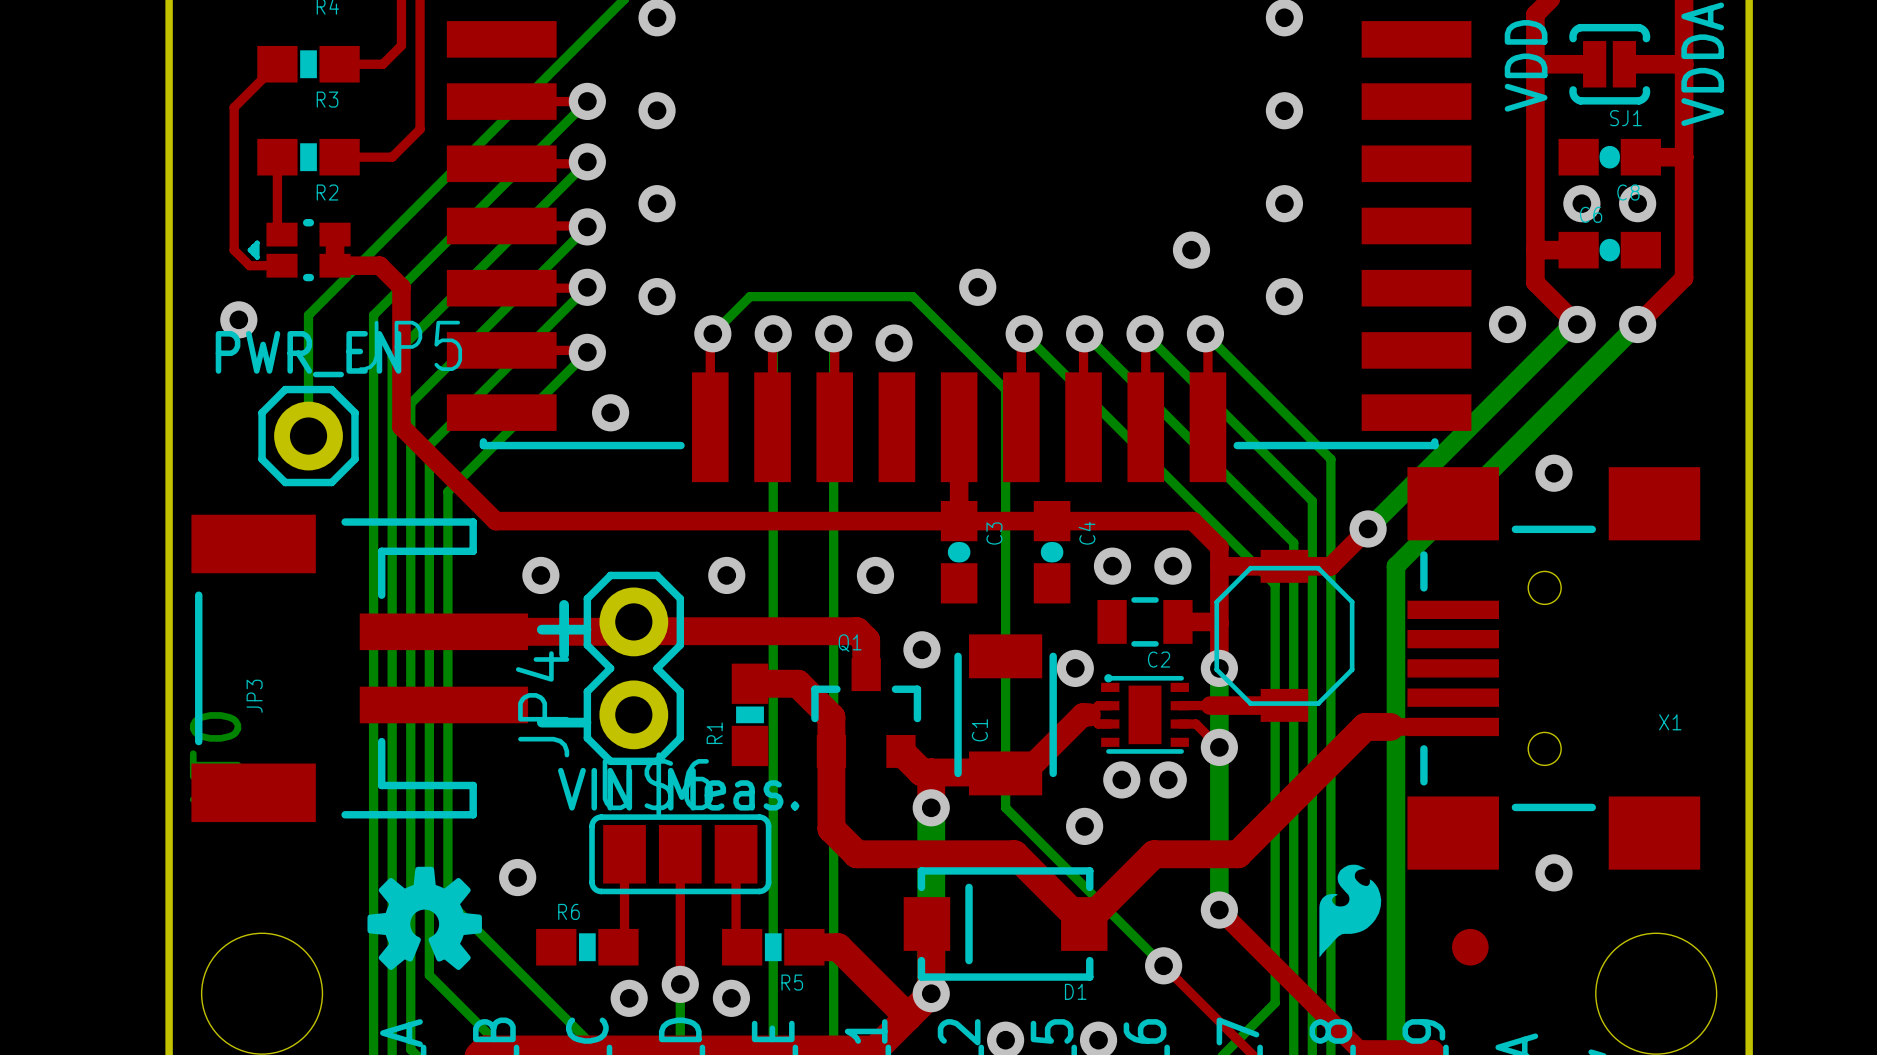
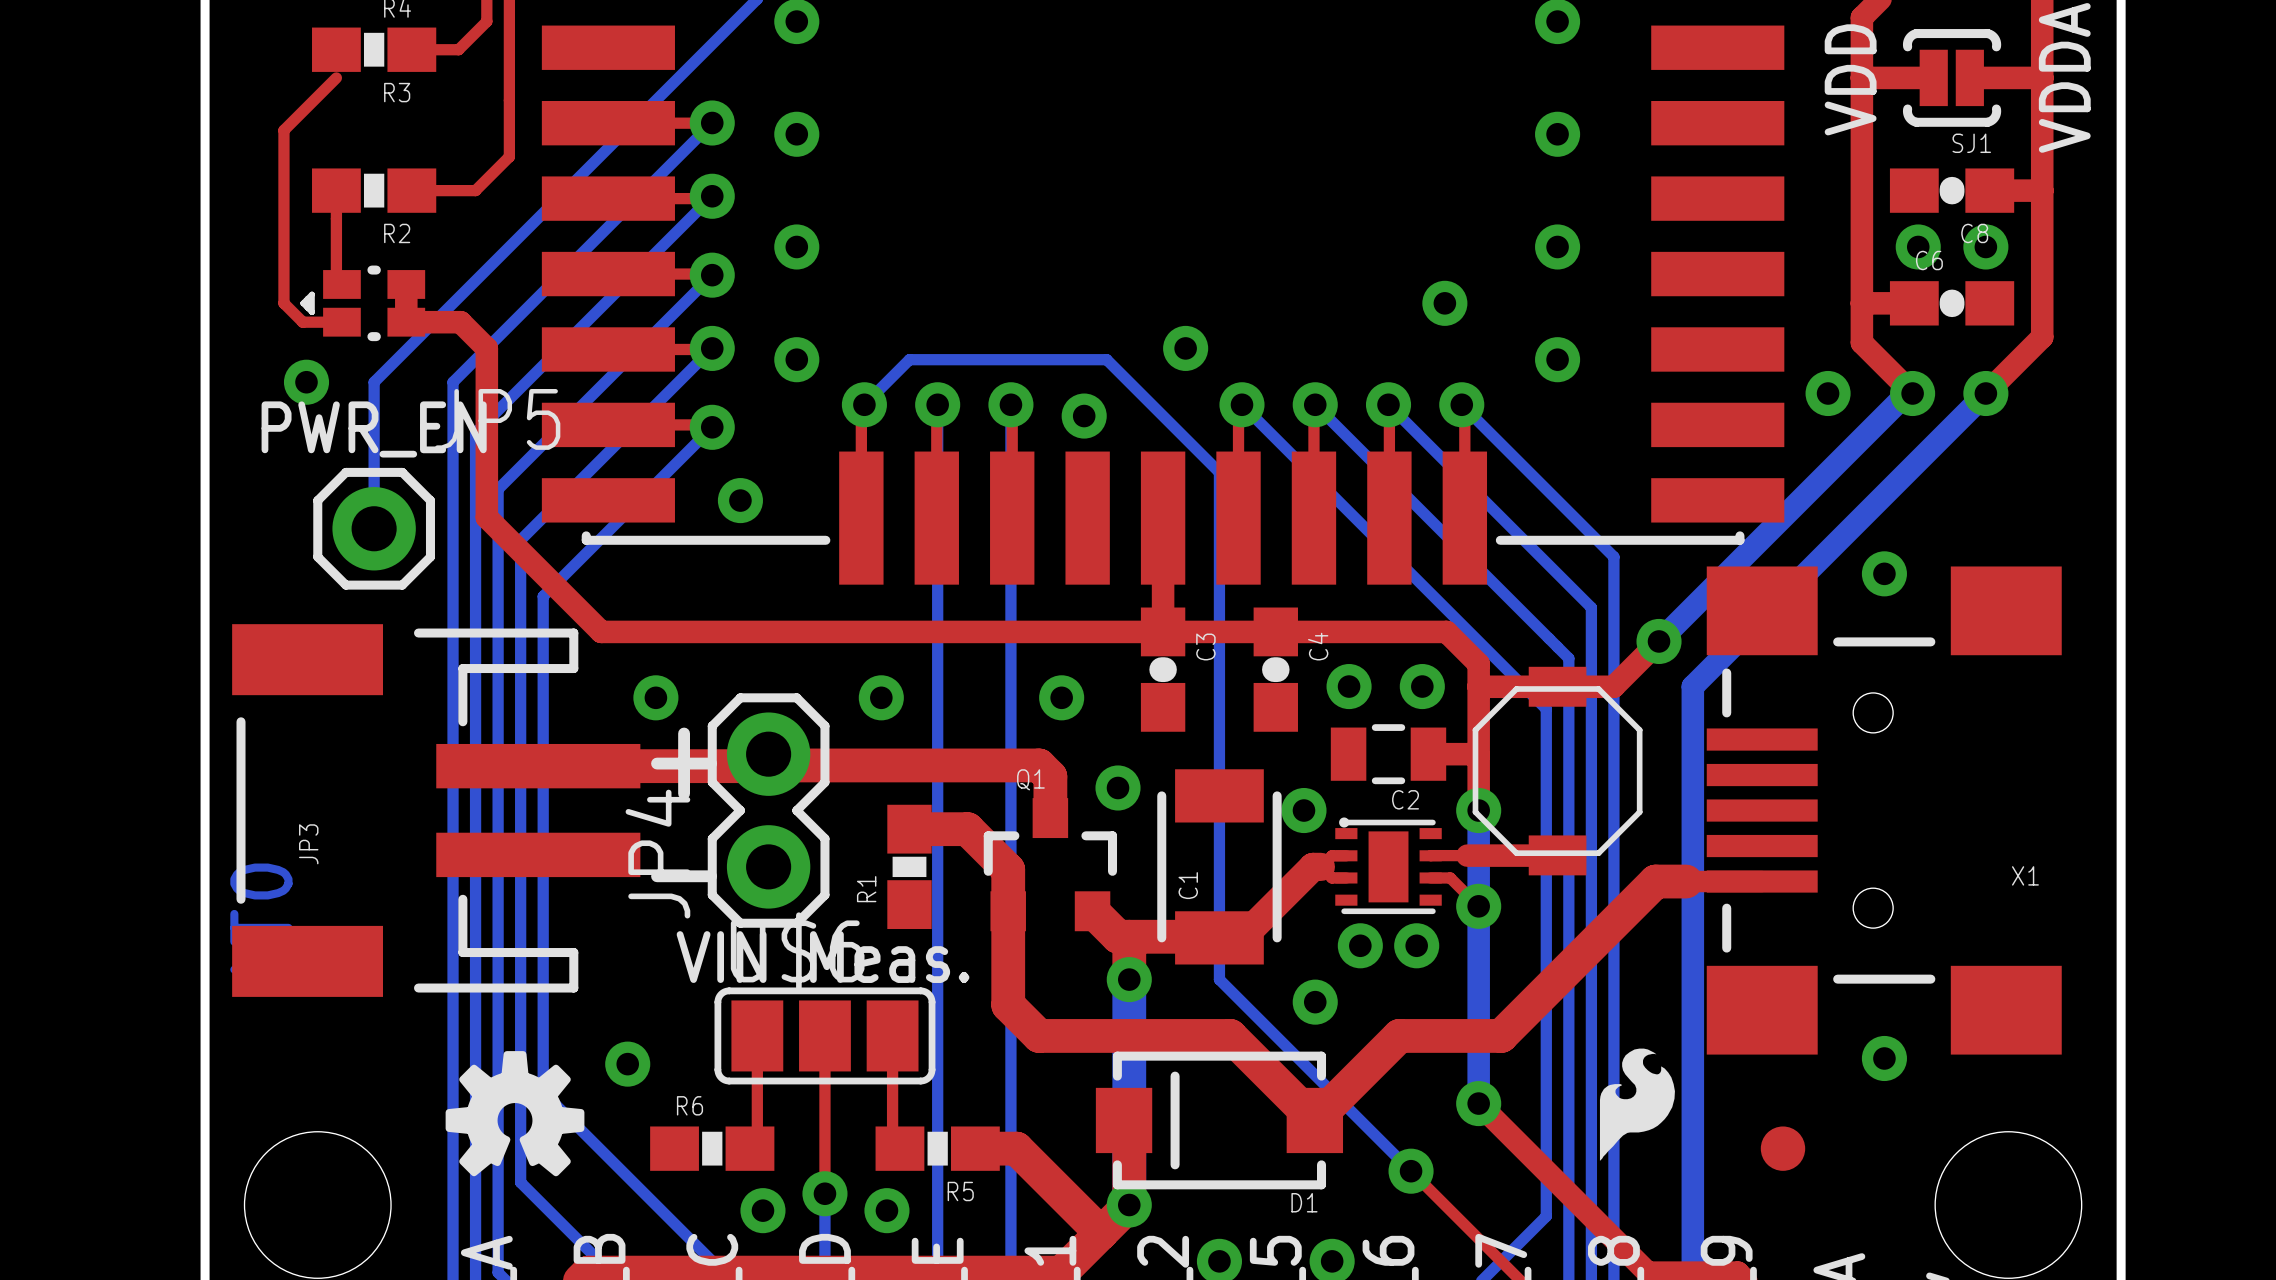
top track: (401, 17) (401, 45) (382, 64) (339, 64) -> (486, 21) (458, 49) (411, 49)
R3 position: (308, 64) -> (374, 49)
via position: (238, 319) -> (306, 382)

